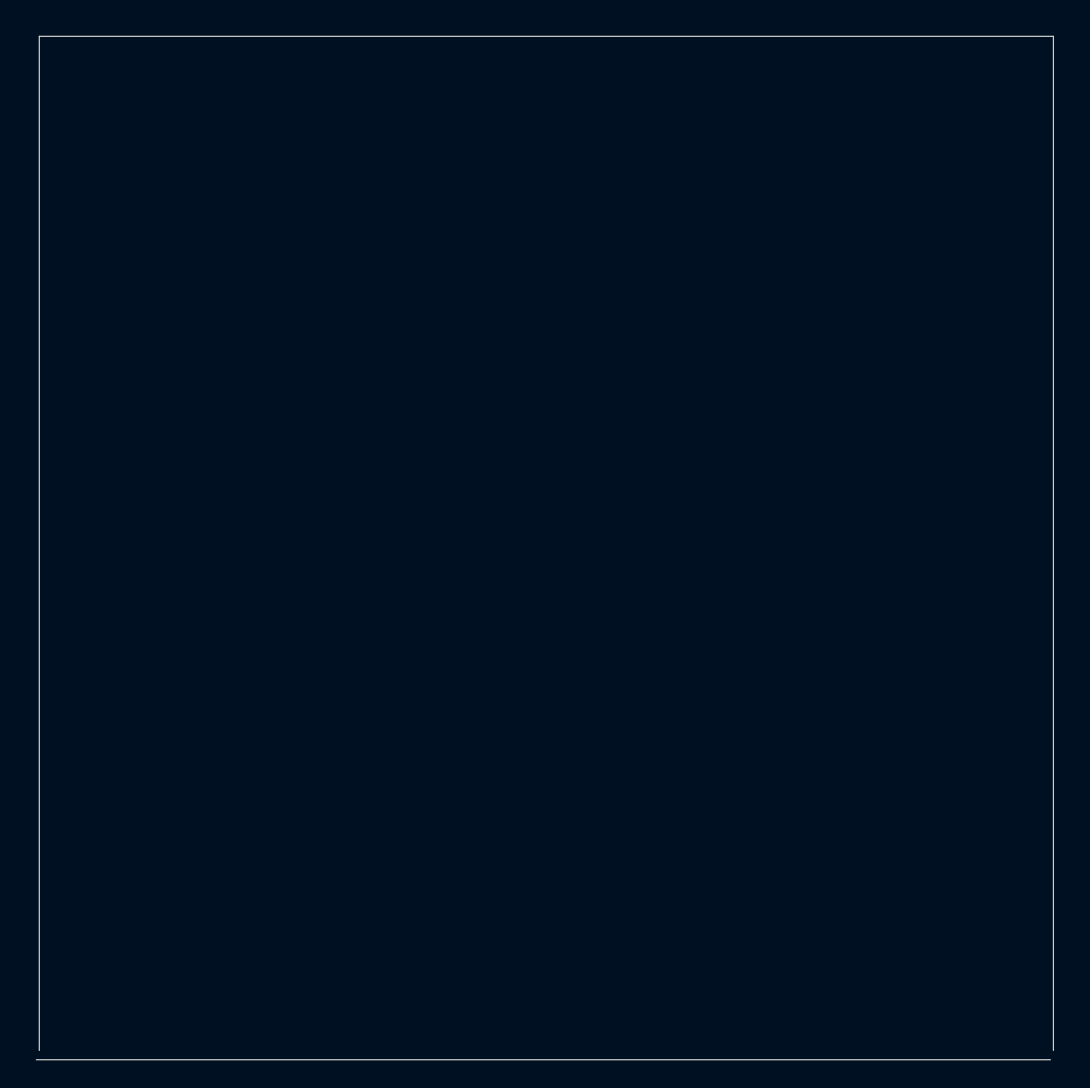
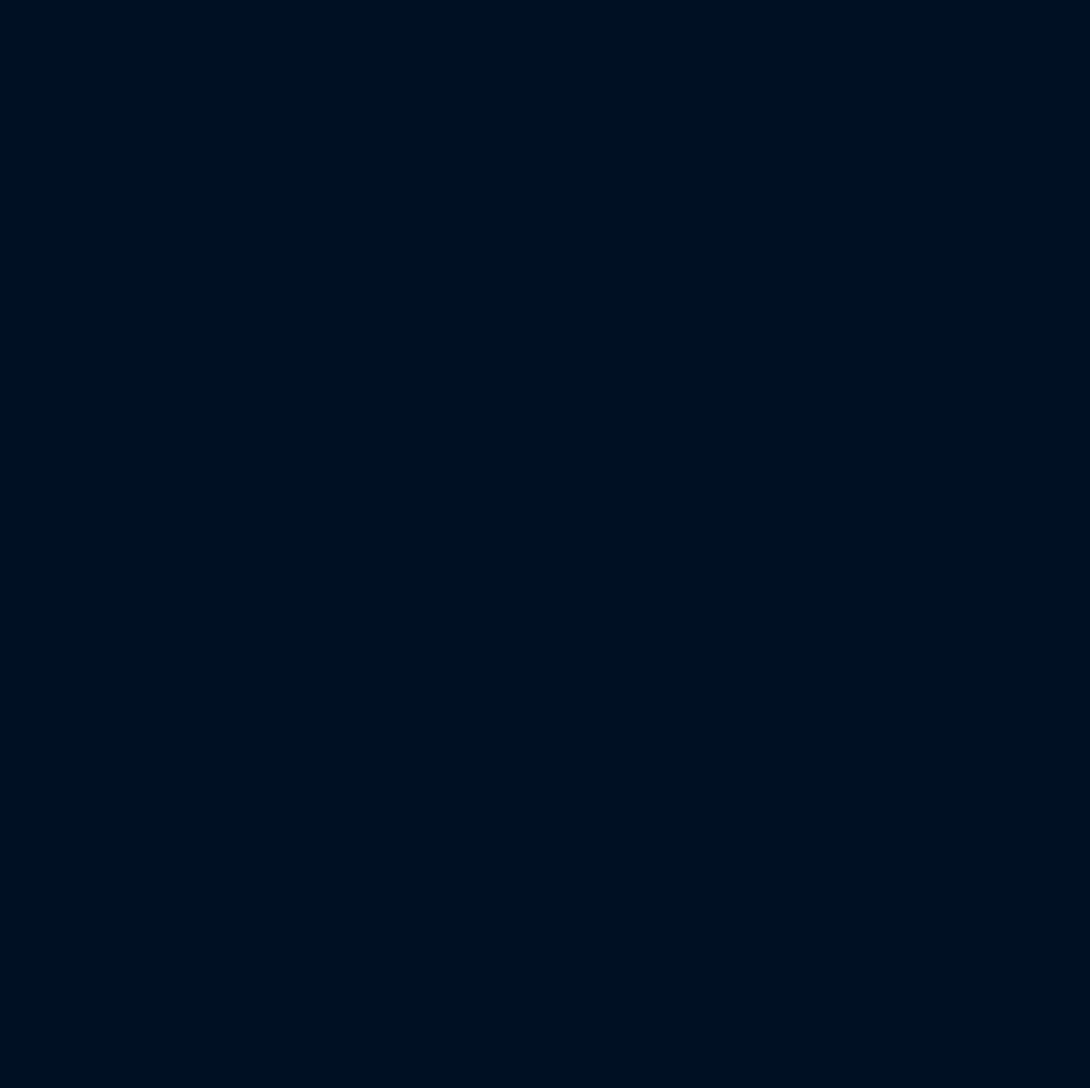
board edge: (1053, 1050) (1053, 36) (39, 36) (39, 1050) -> none
board edge: (1050, 1059) (36, 1059) -> none

